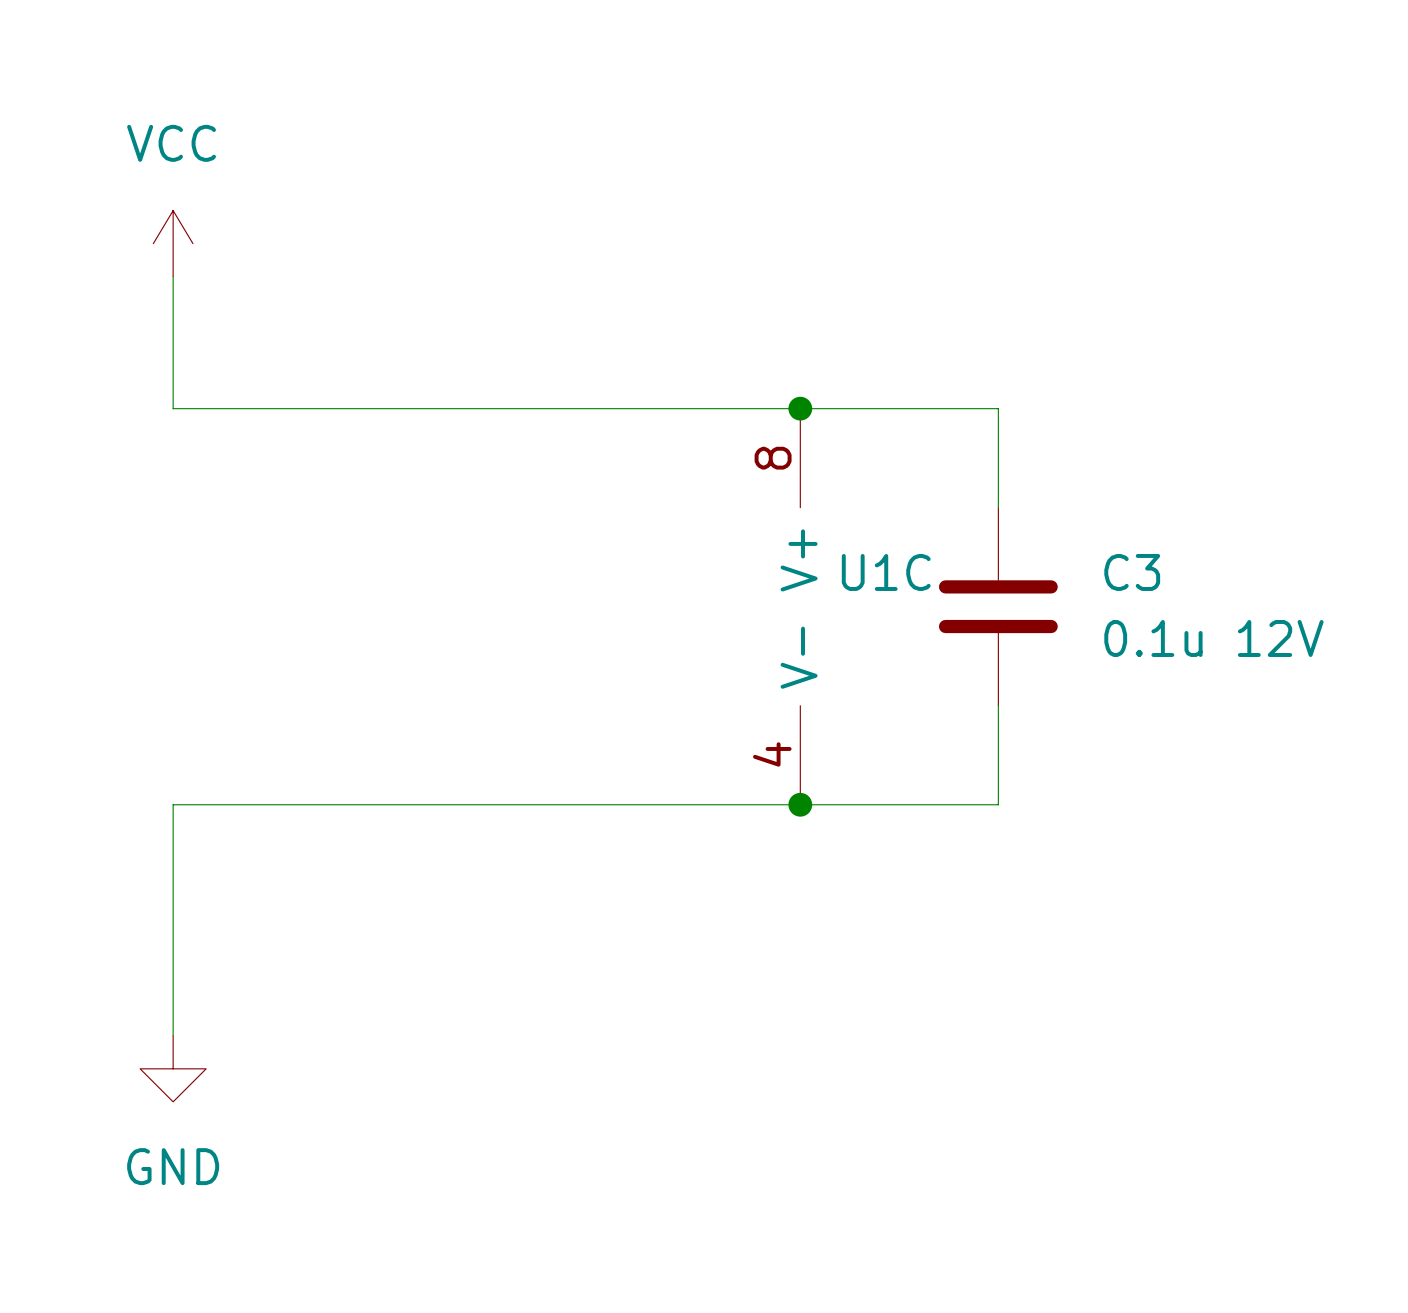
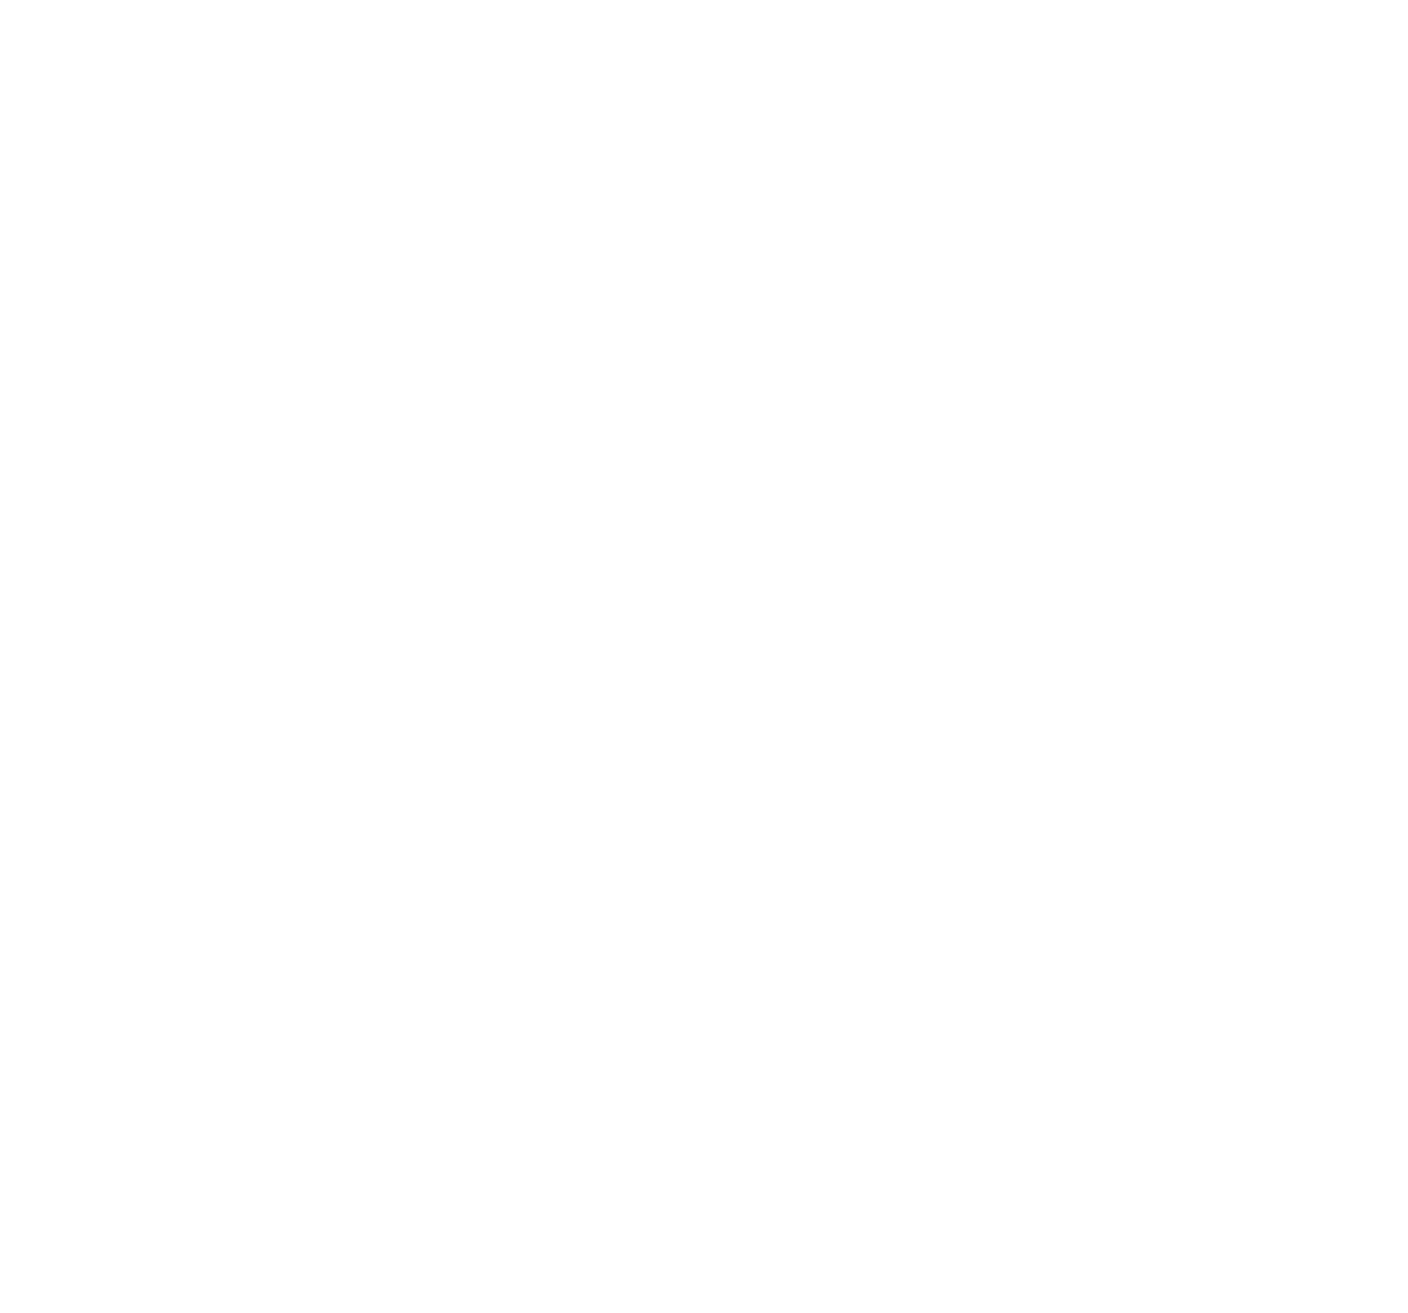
power symbol: VCC (173, 243) -> none
wire: (173, 276) (173, 408) (998, 408) (998, 507) -> none
junction: (800, 408) -> none
U1C: (800, 606) -> none
C3: 0.1u 12V (998, 606) -> none
wire: (998, 705) (998, 804) (173, 804) (173, 1035) -> none
junction: (800, 804) -> none
power symbol: GND (173, 1068) -> none

